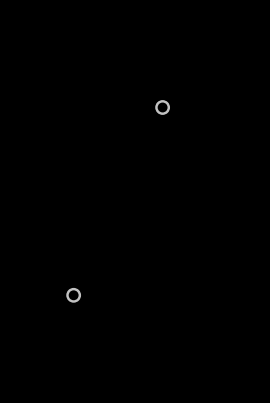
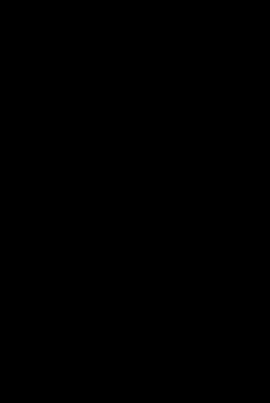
via: (162, 107) -> none
via: (73, 295) -> none

